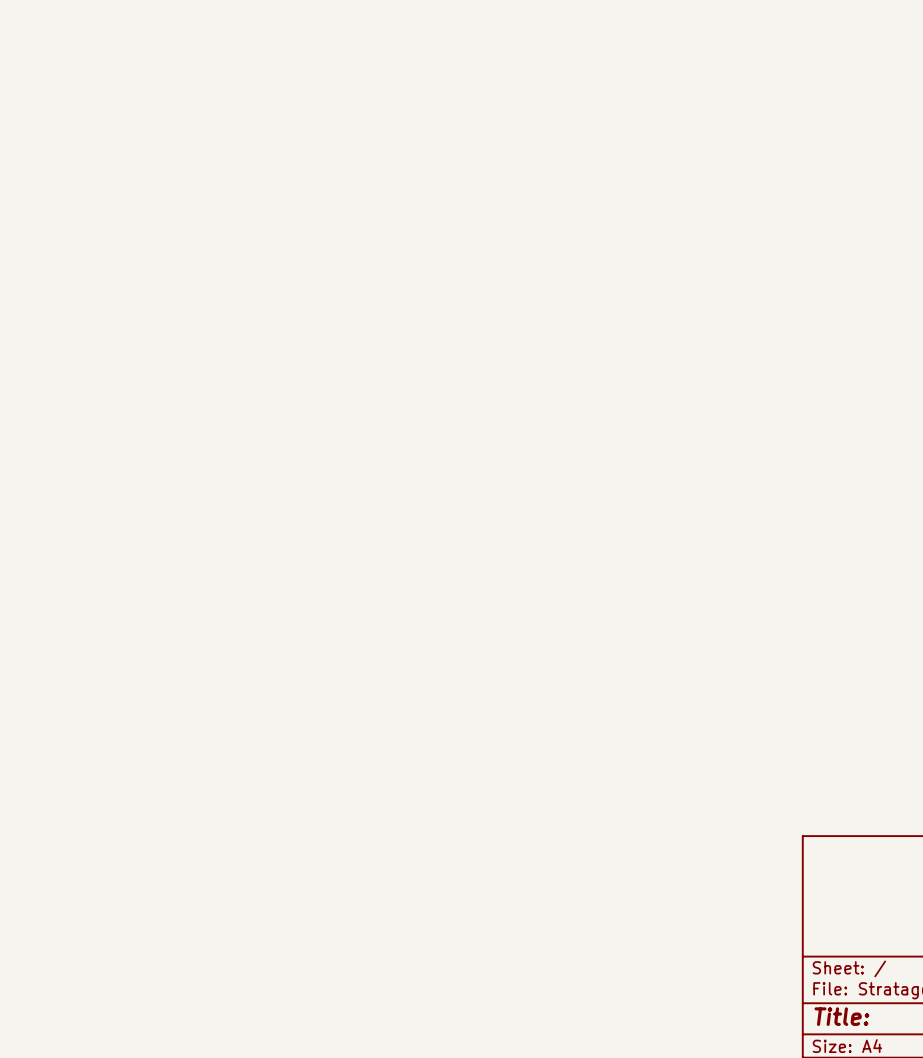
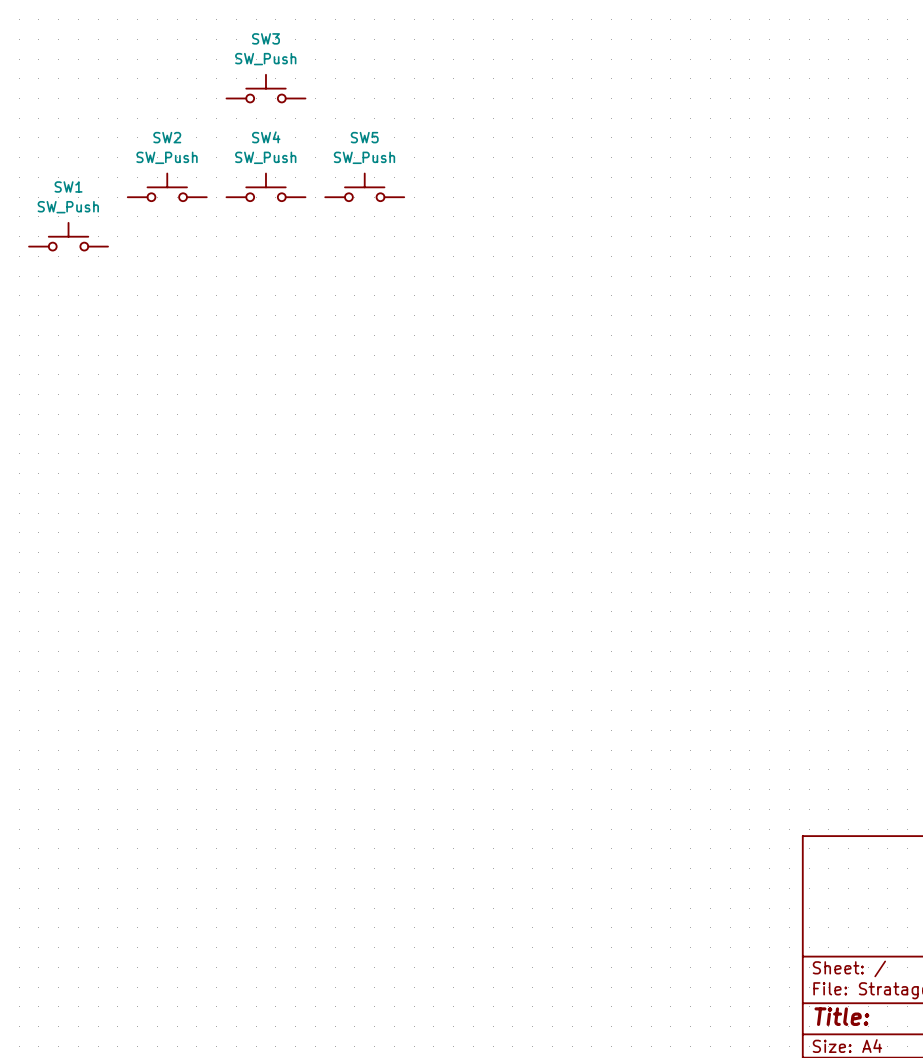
SW3: none -> SW_Push (265, 88)
SW2: none -> SW_Push (167, 187)
SW4: none -> SW_Push (265, 187)
SW5: none -> SW_Push (364, 187)
SW1: none -> SW_Push (68, 236)

